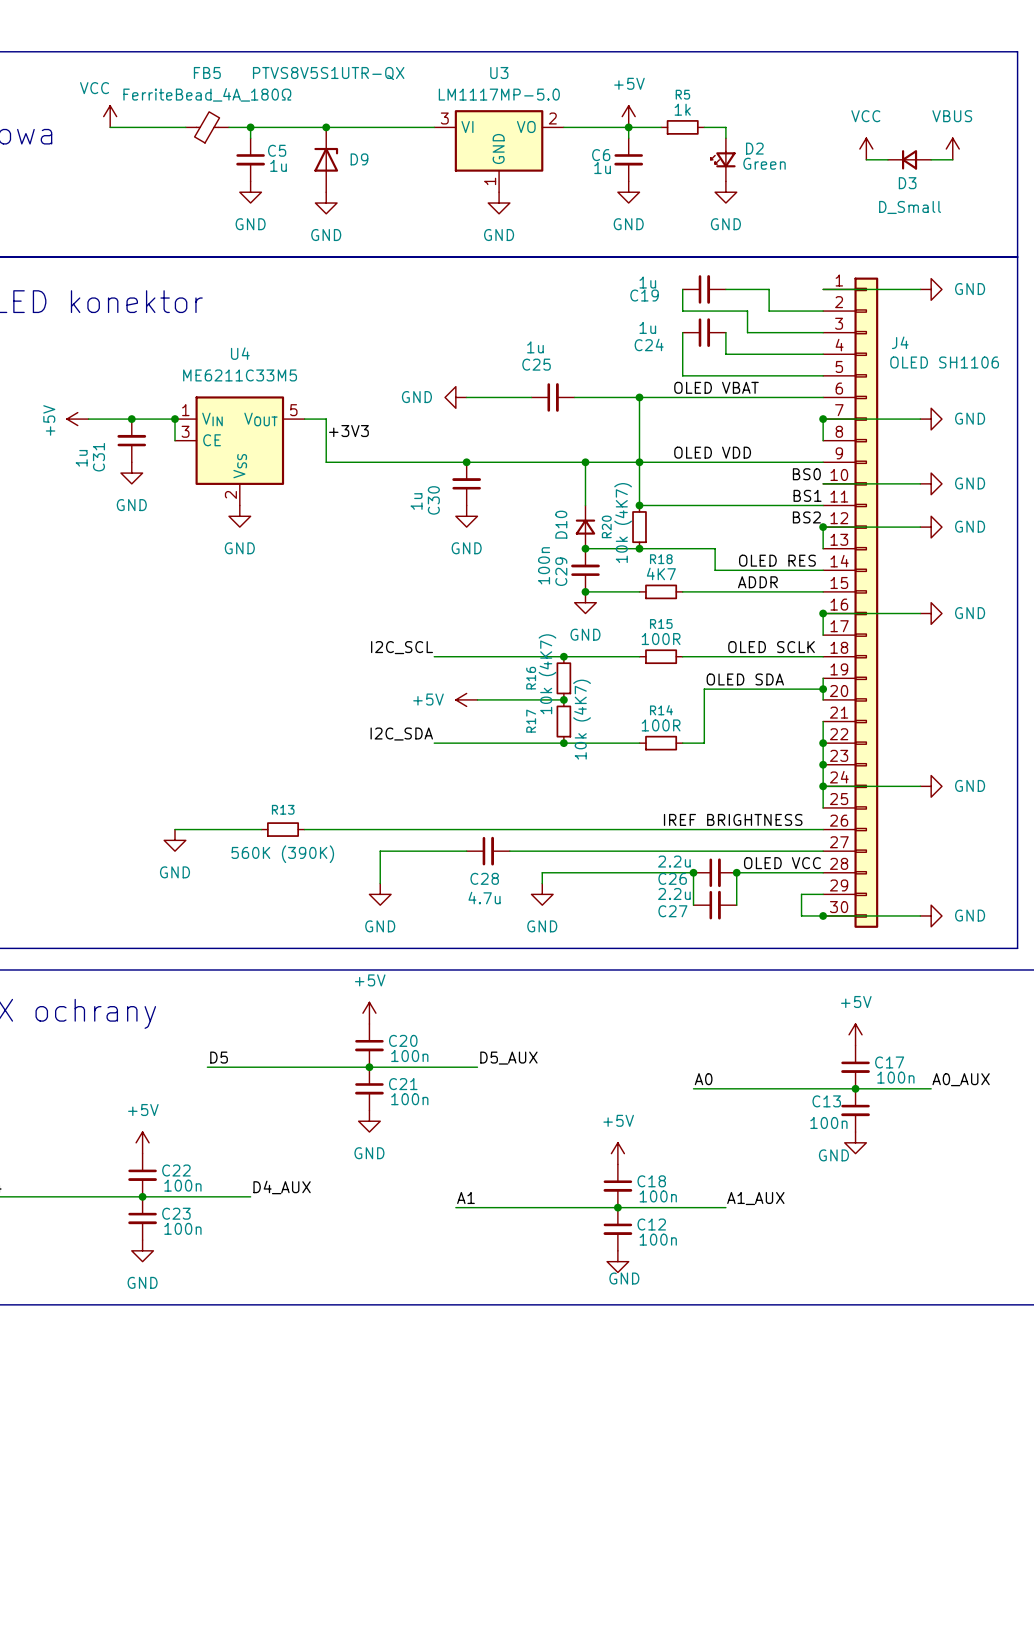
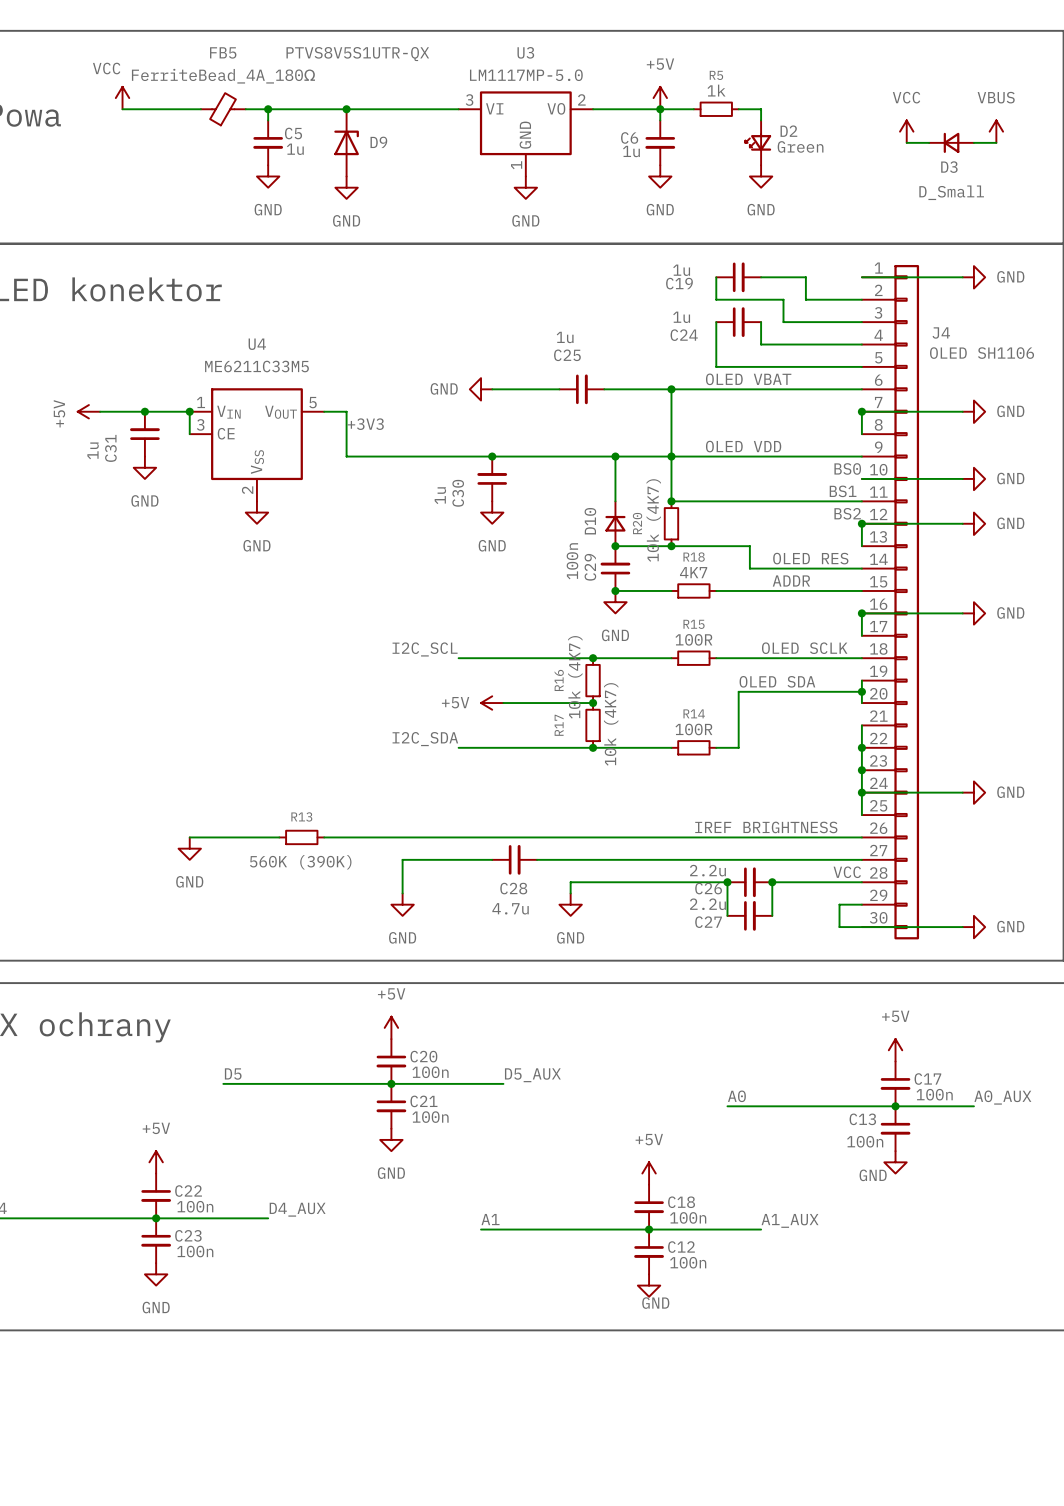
label: OLED VCC (782, 863) -> VCC (847, 872)
junction: (823, 915) -> none

